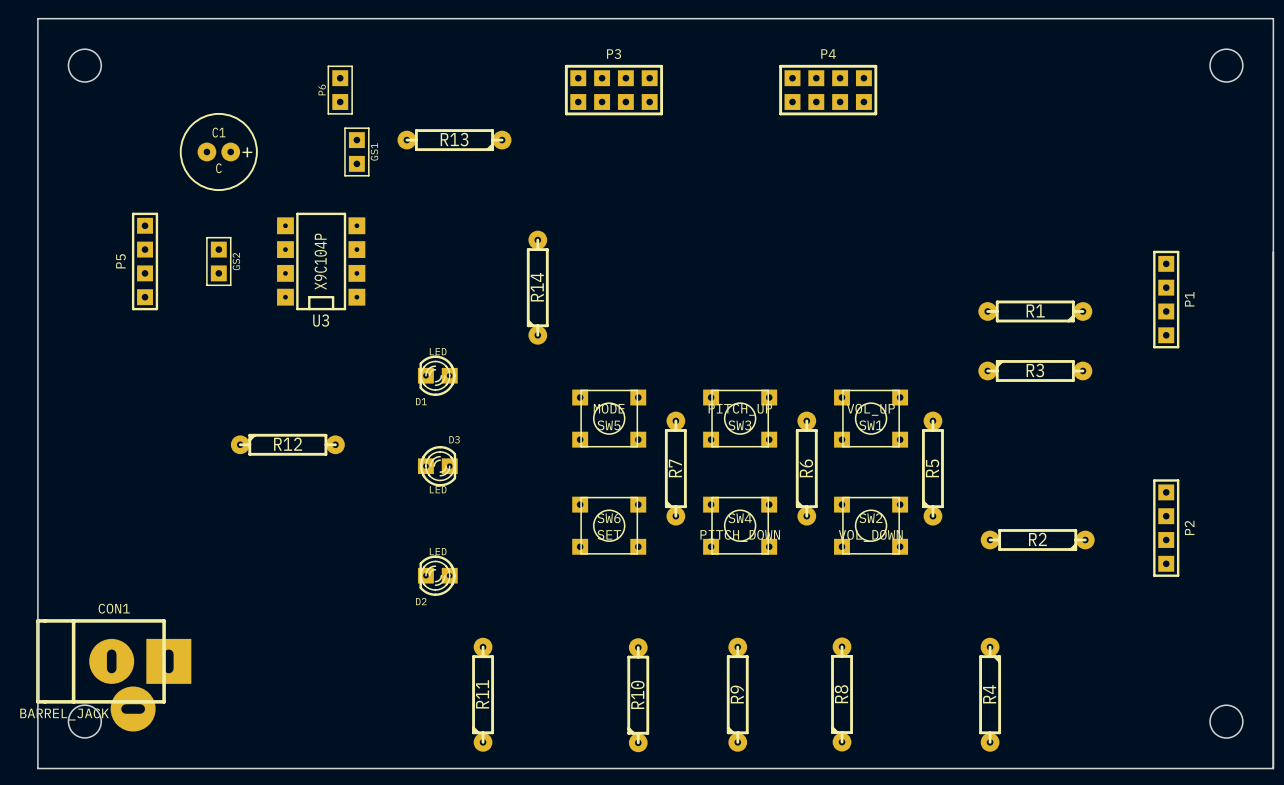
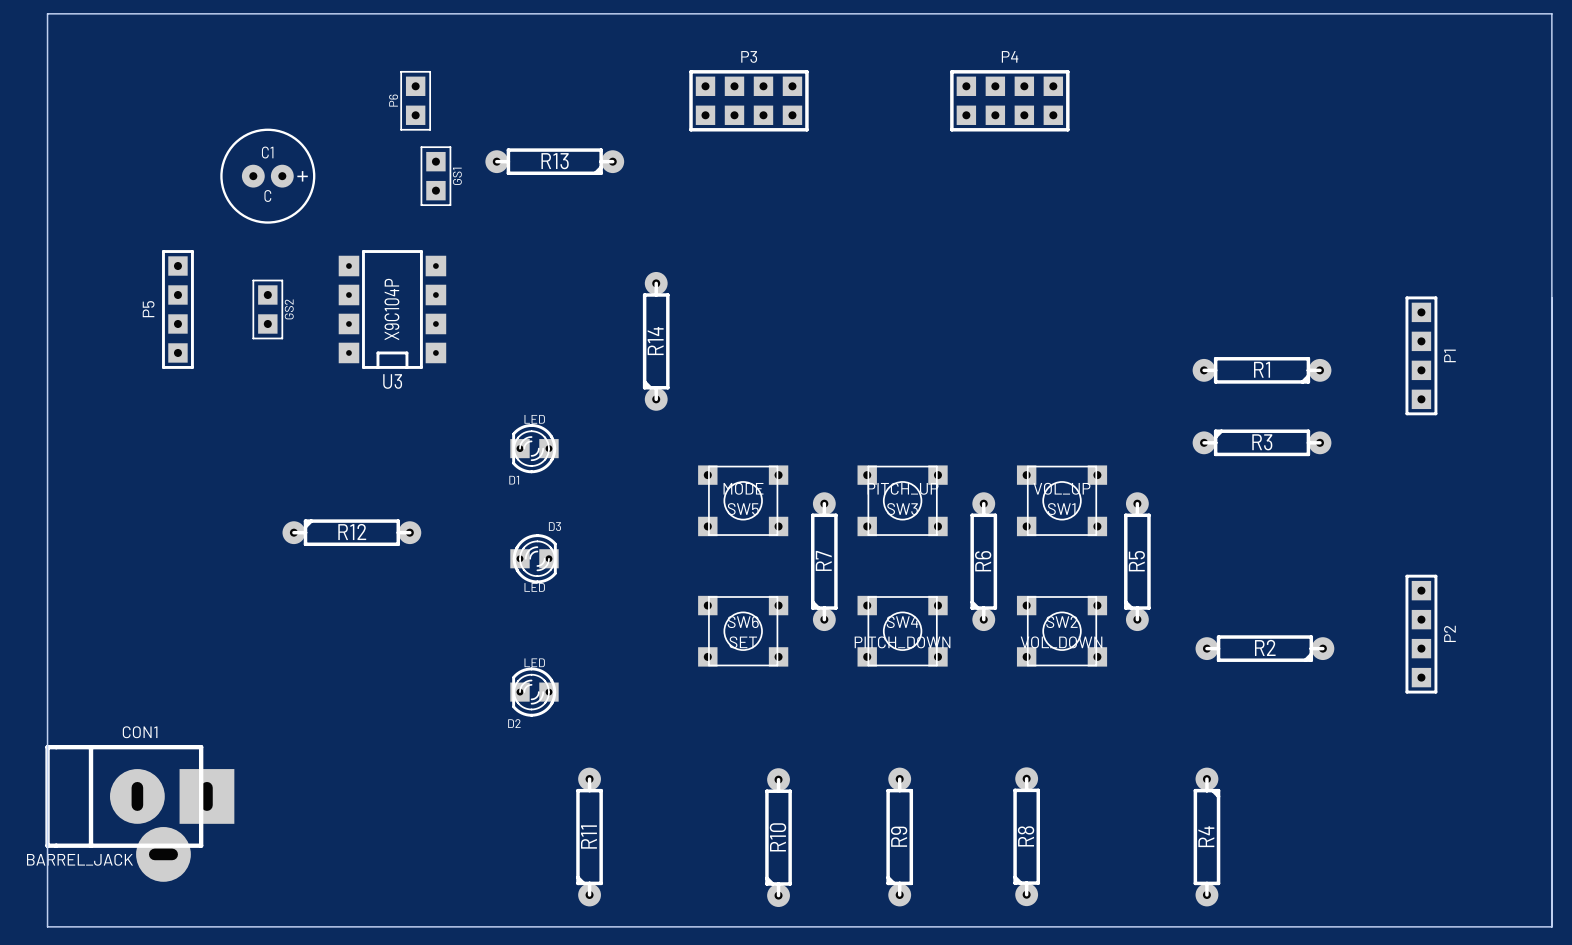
round board edge: [67, 48, 102, 83] -> none
round board edge: [1209, 48, 1244, 83] -> none
round board edge: [67, 704, 102, 739] -> none
round board edge: [1209, 704, 1244, 739] -> none

